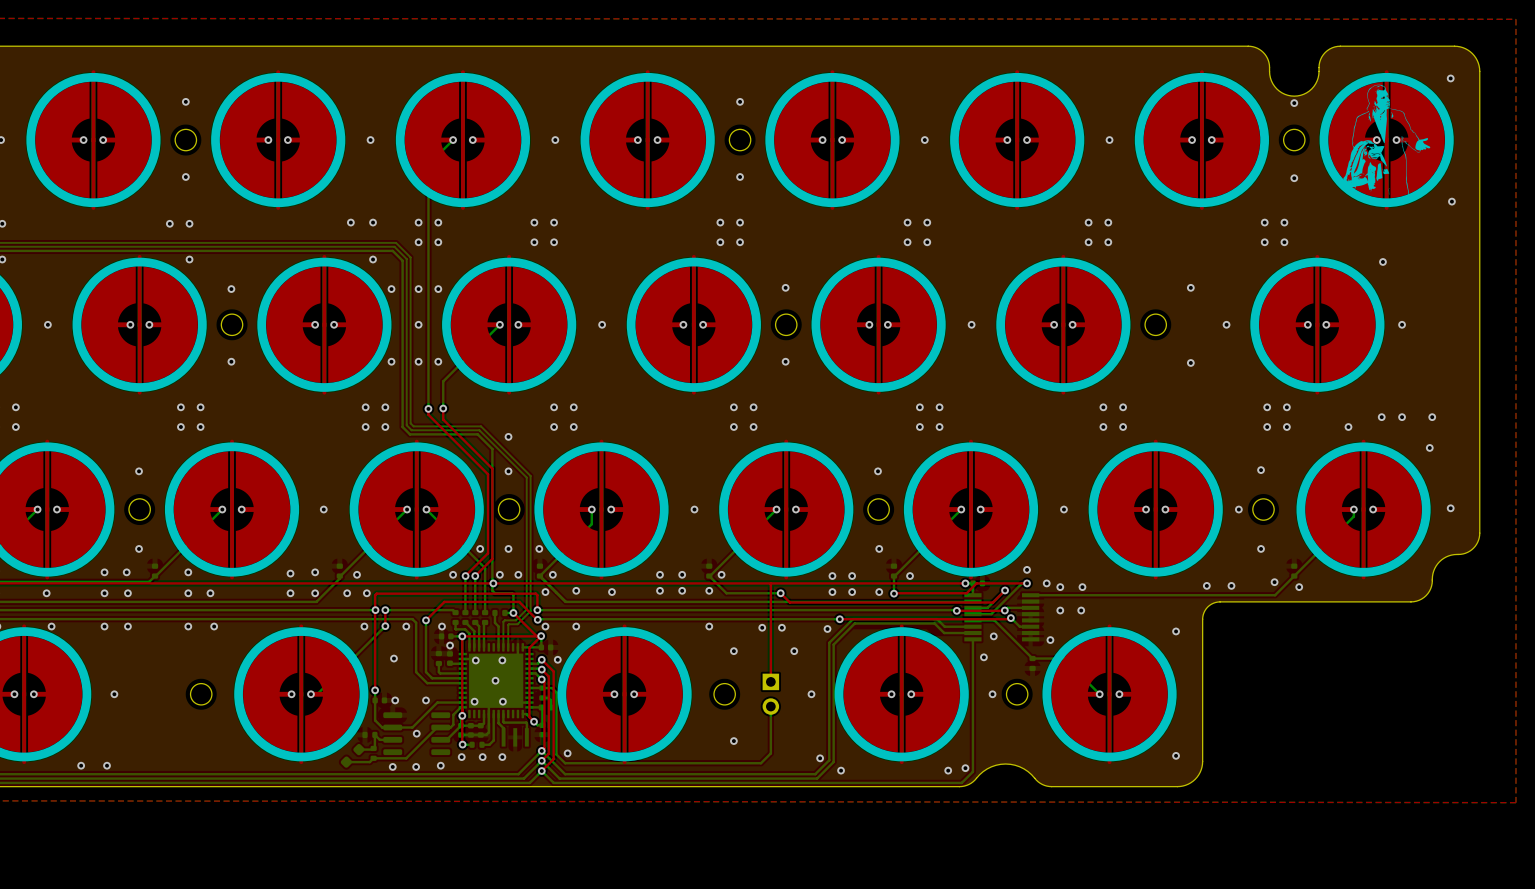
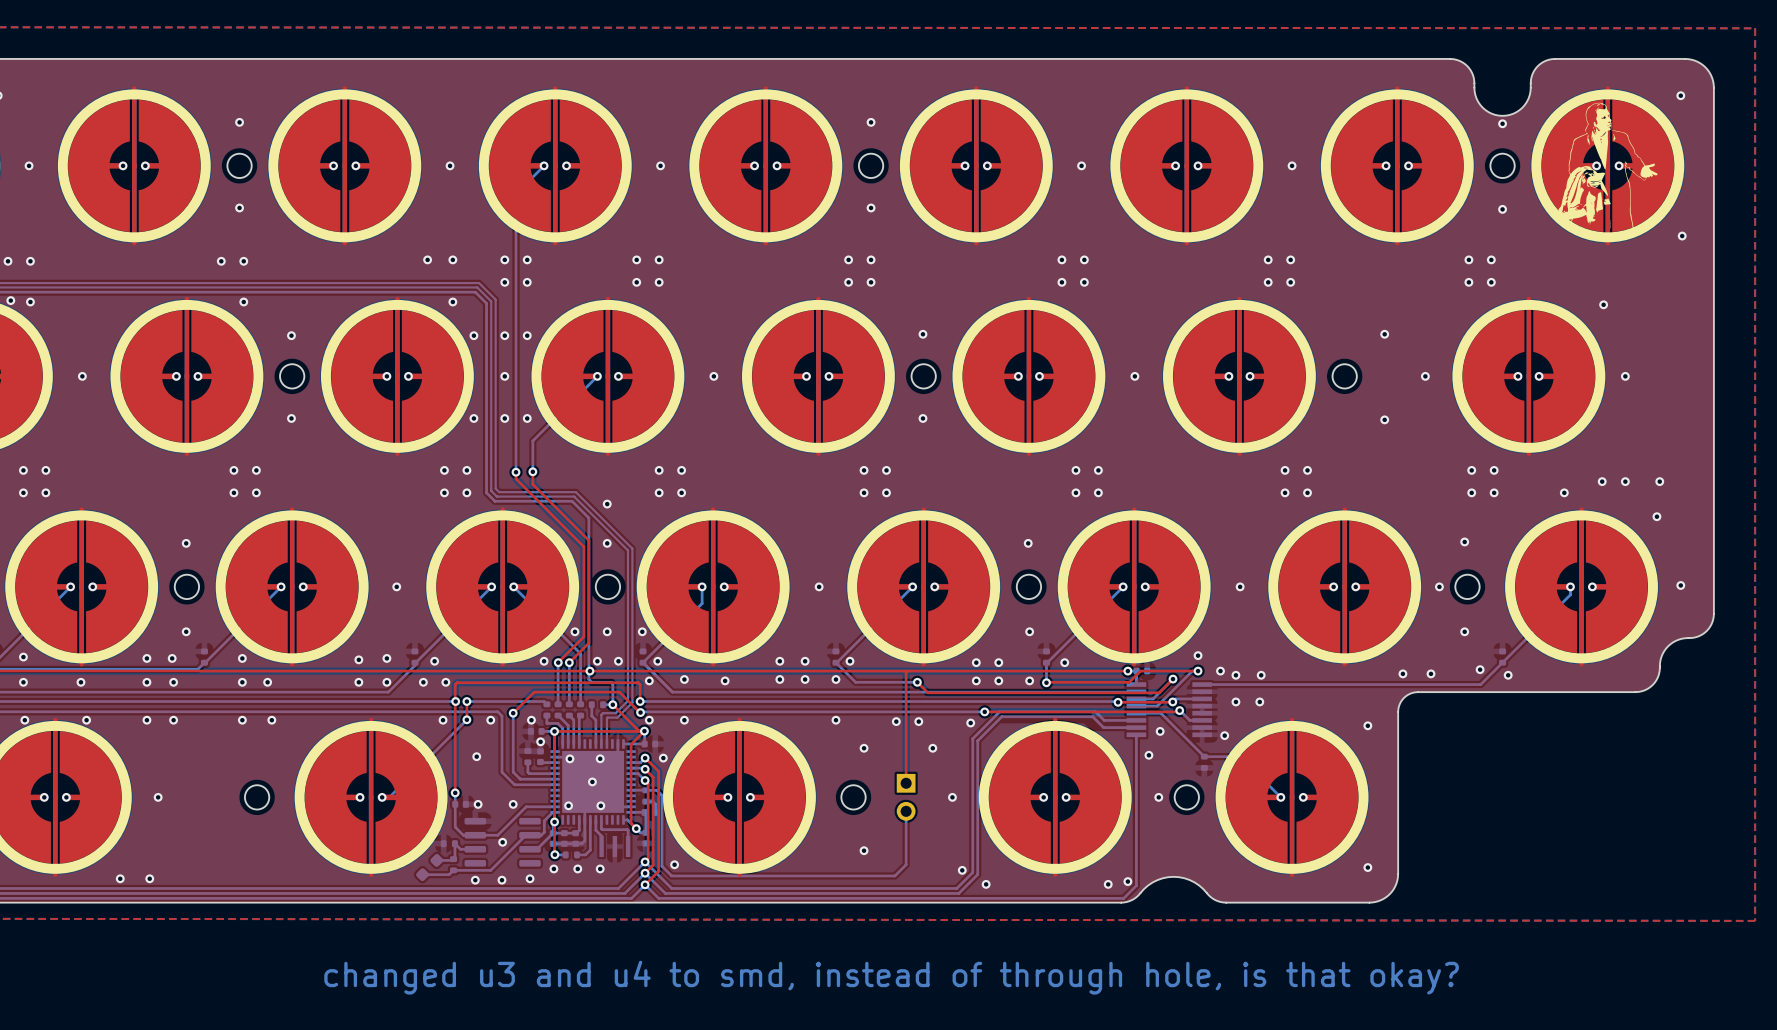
text: none -> changed u3 and u4 to smd, instead of through hole, is that okay? (891, 977)

